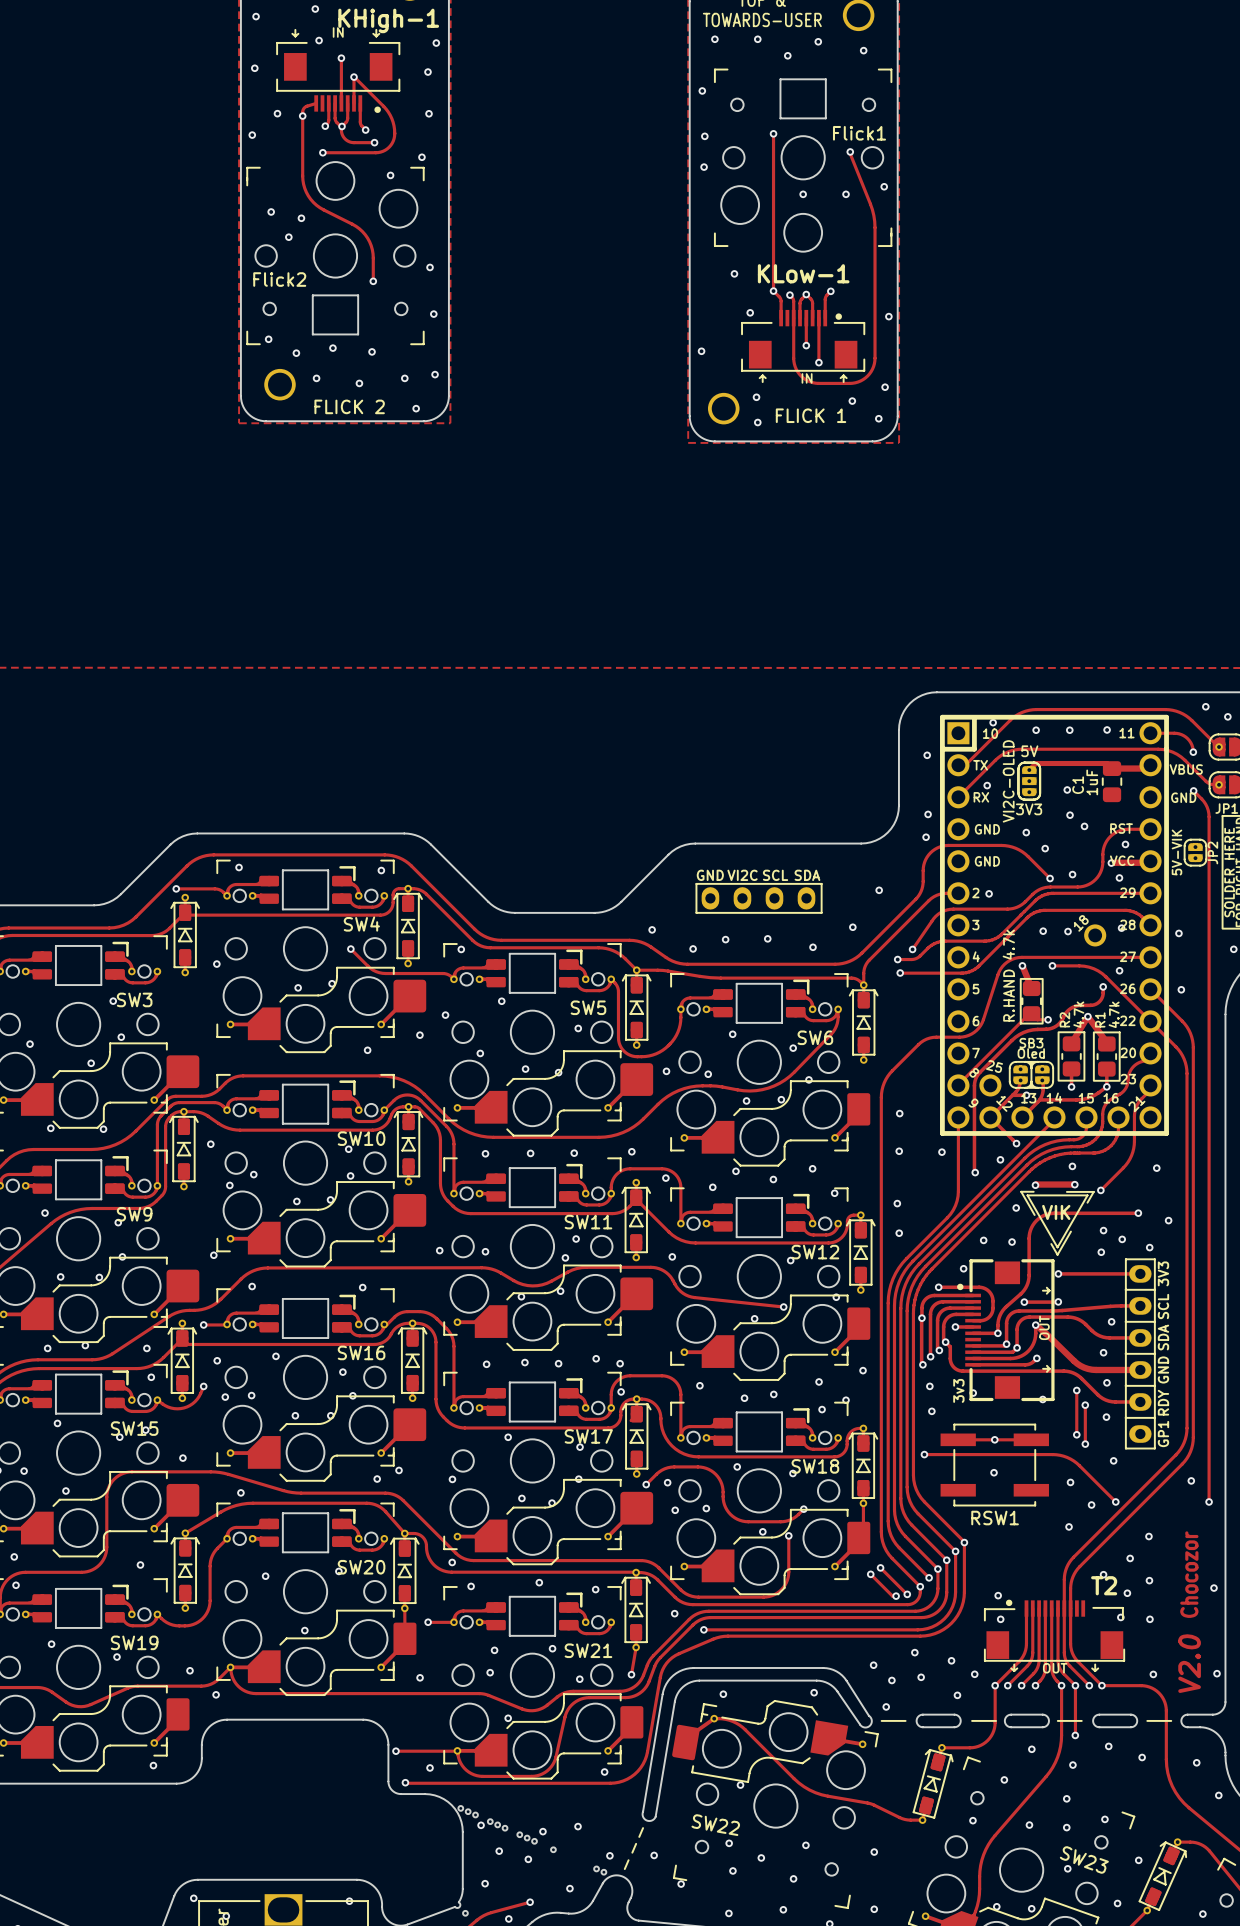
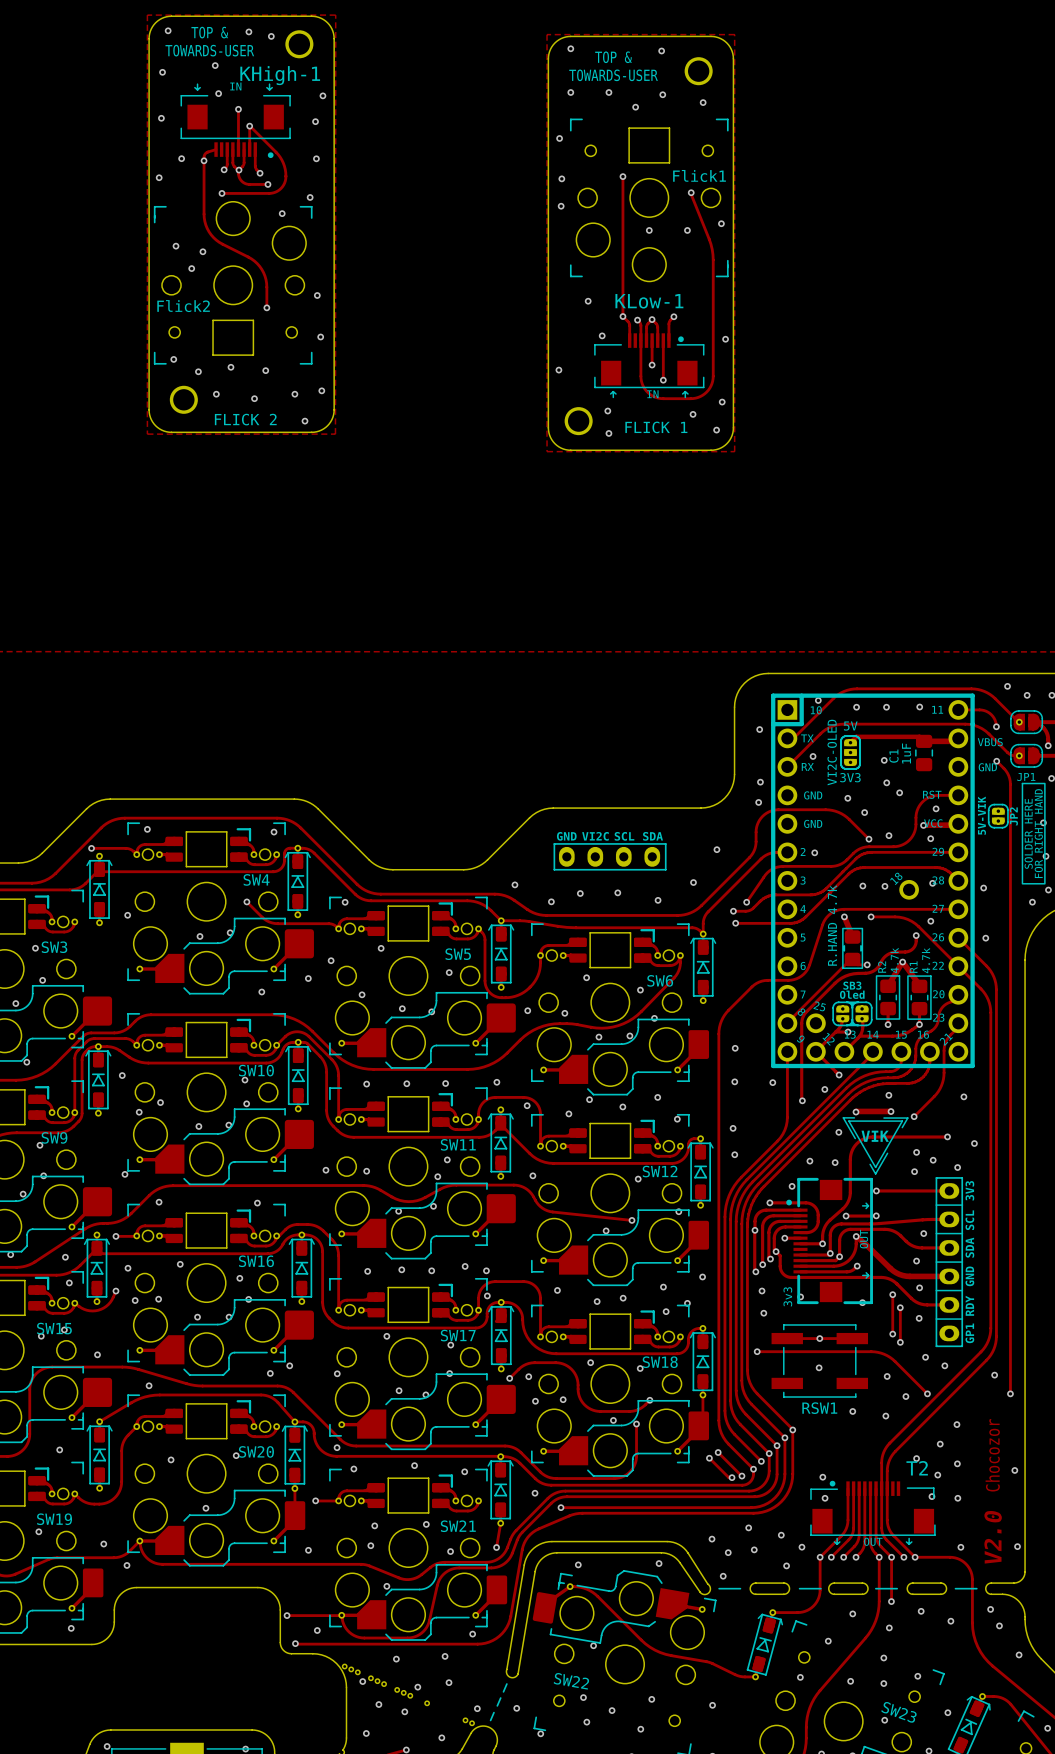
via: none -> (944, 1365)
via: none -> (852, 1411)
via: none -> (990, 1609)
via: none -> (445, 1656)
via: none -> (396, 1659)

